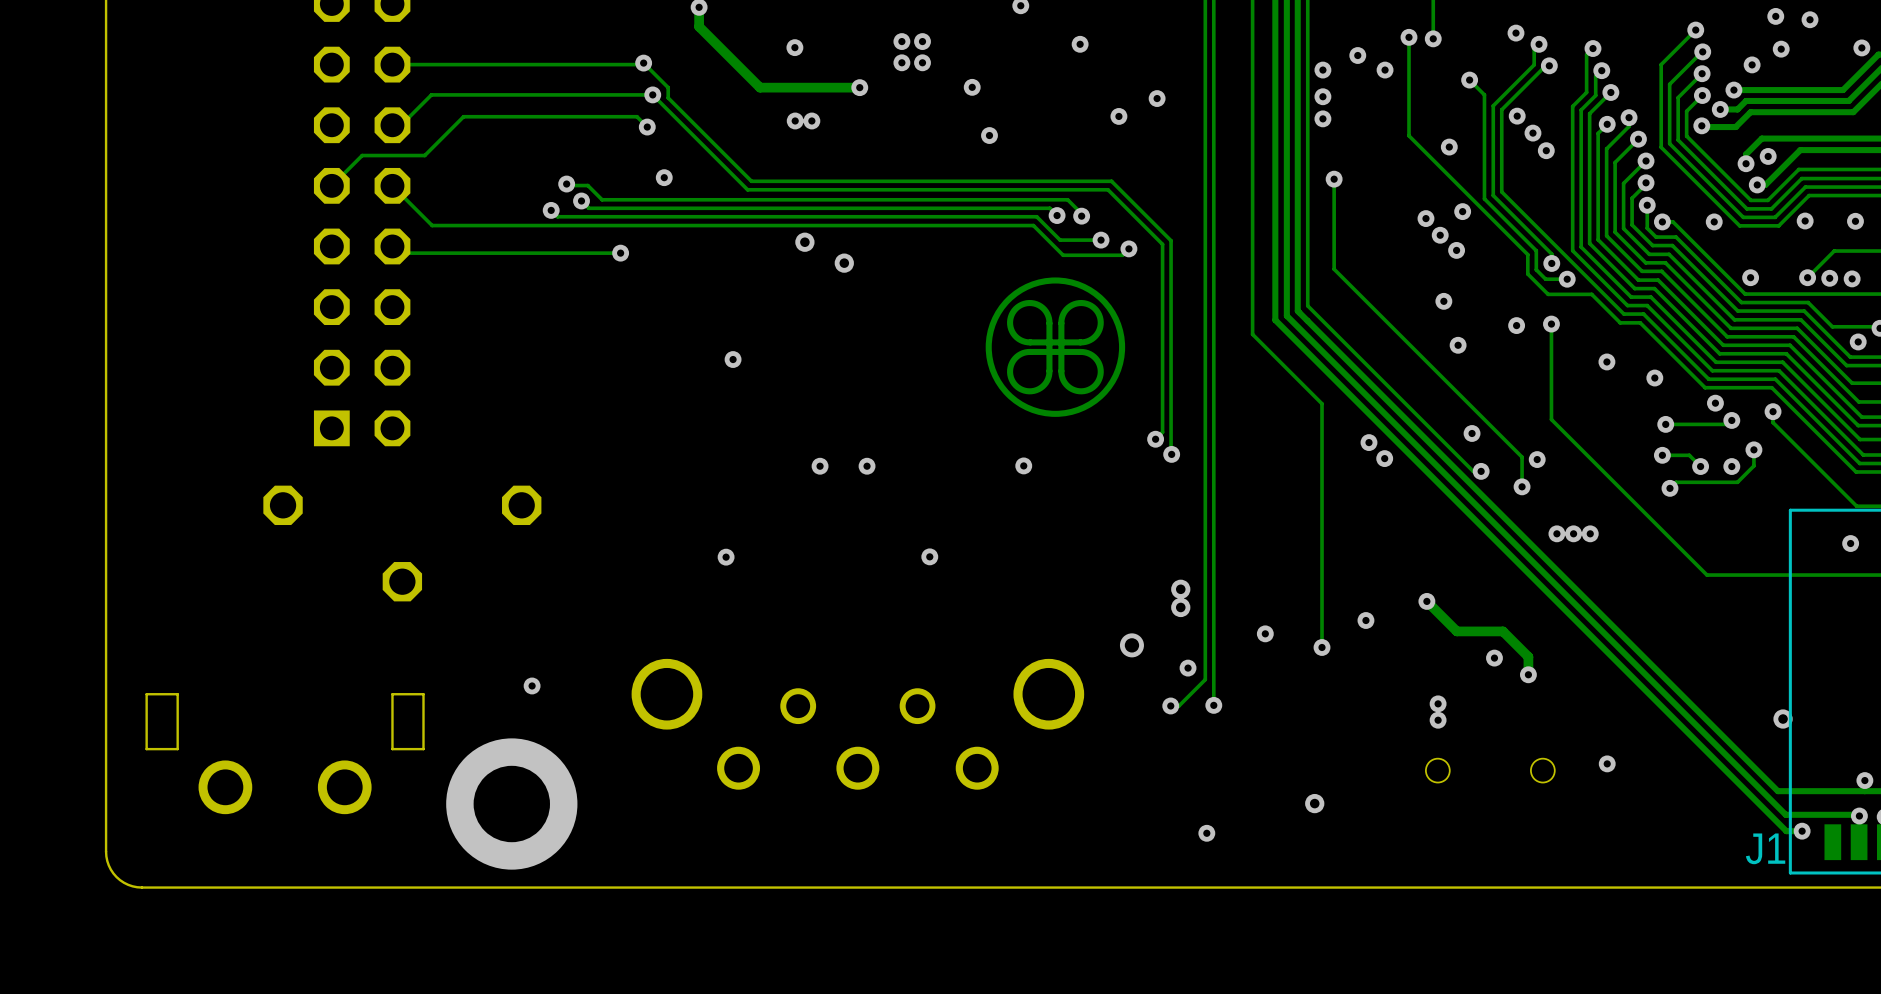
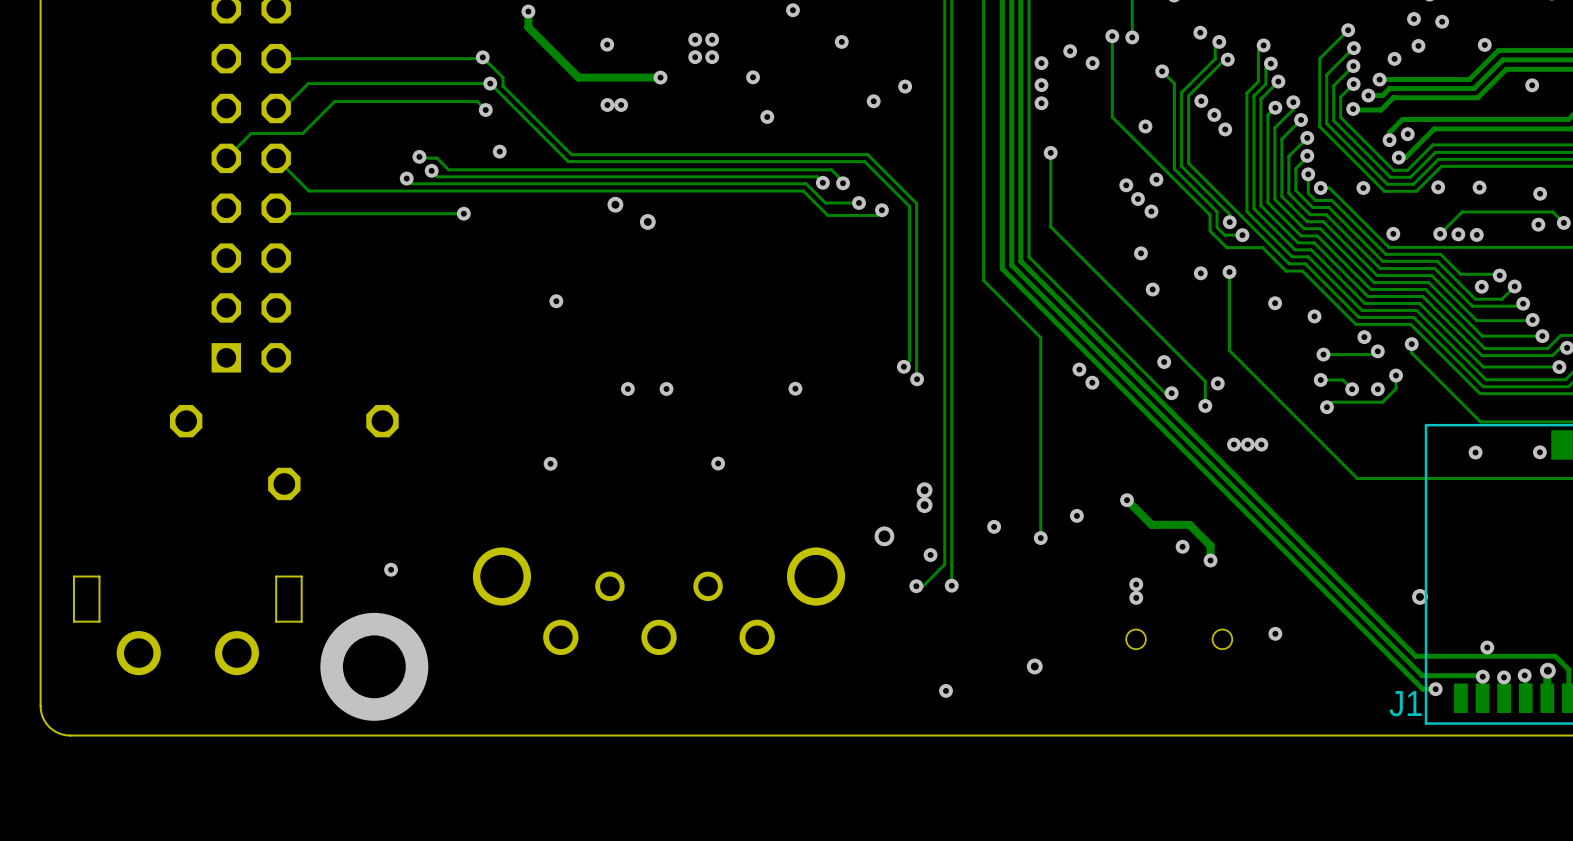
drawing: [985, 277, 1126, 417] -> none

